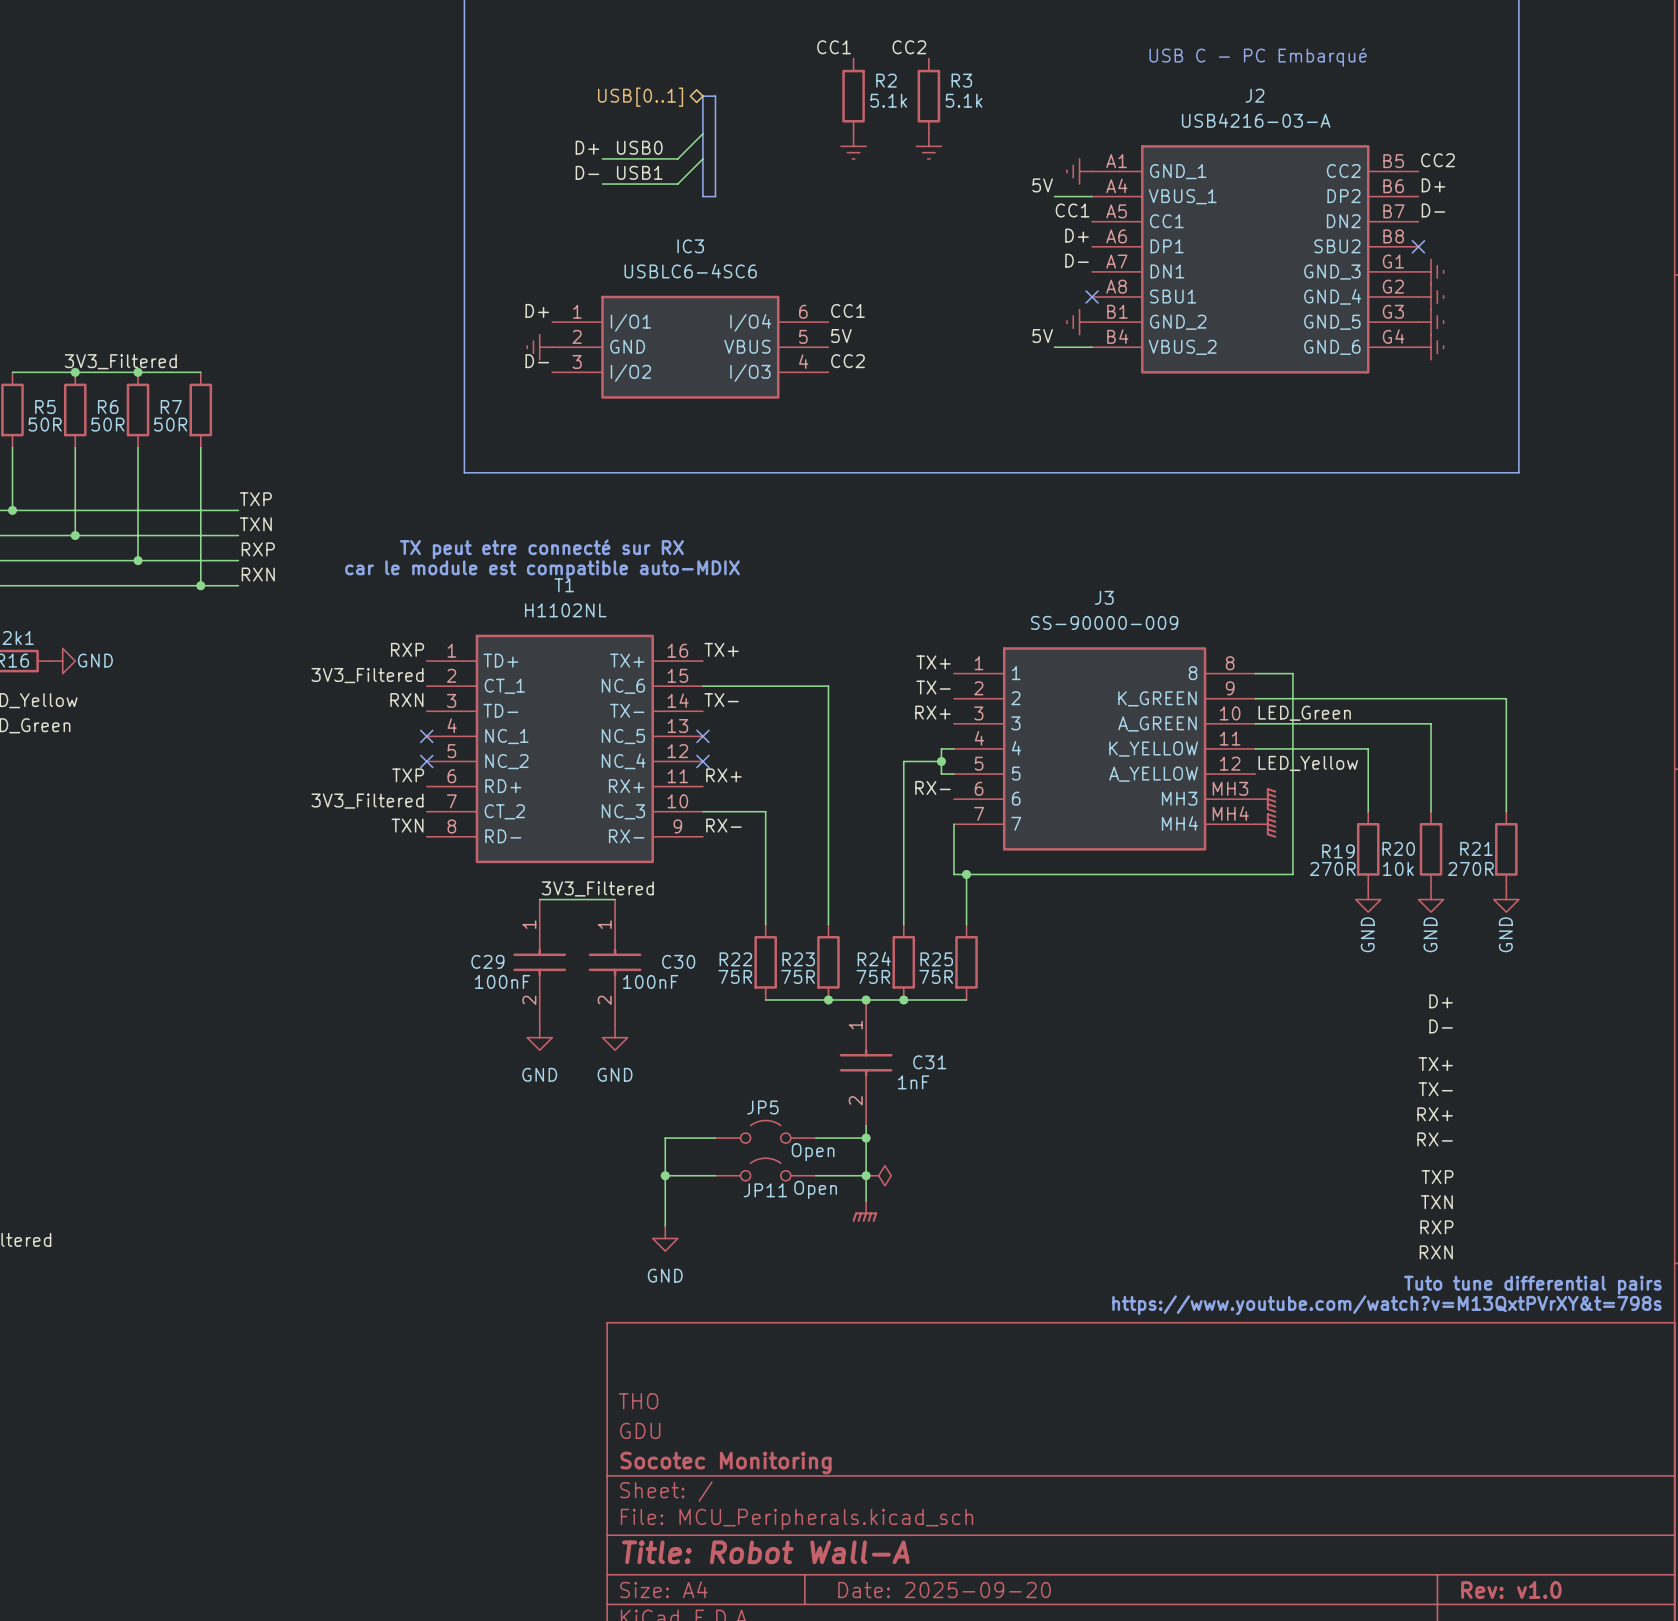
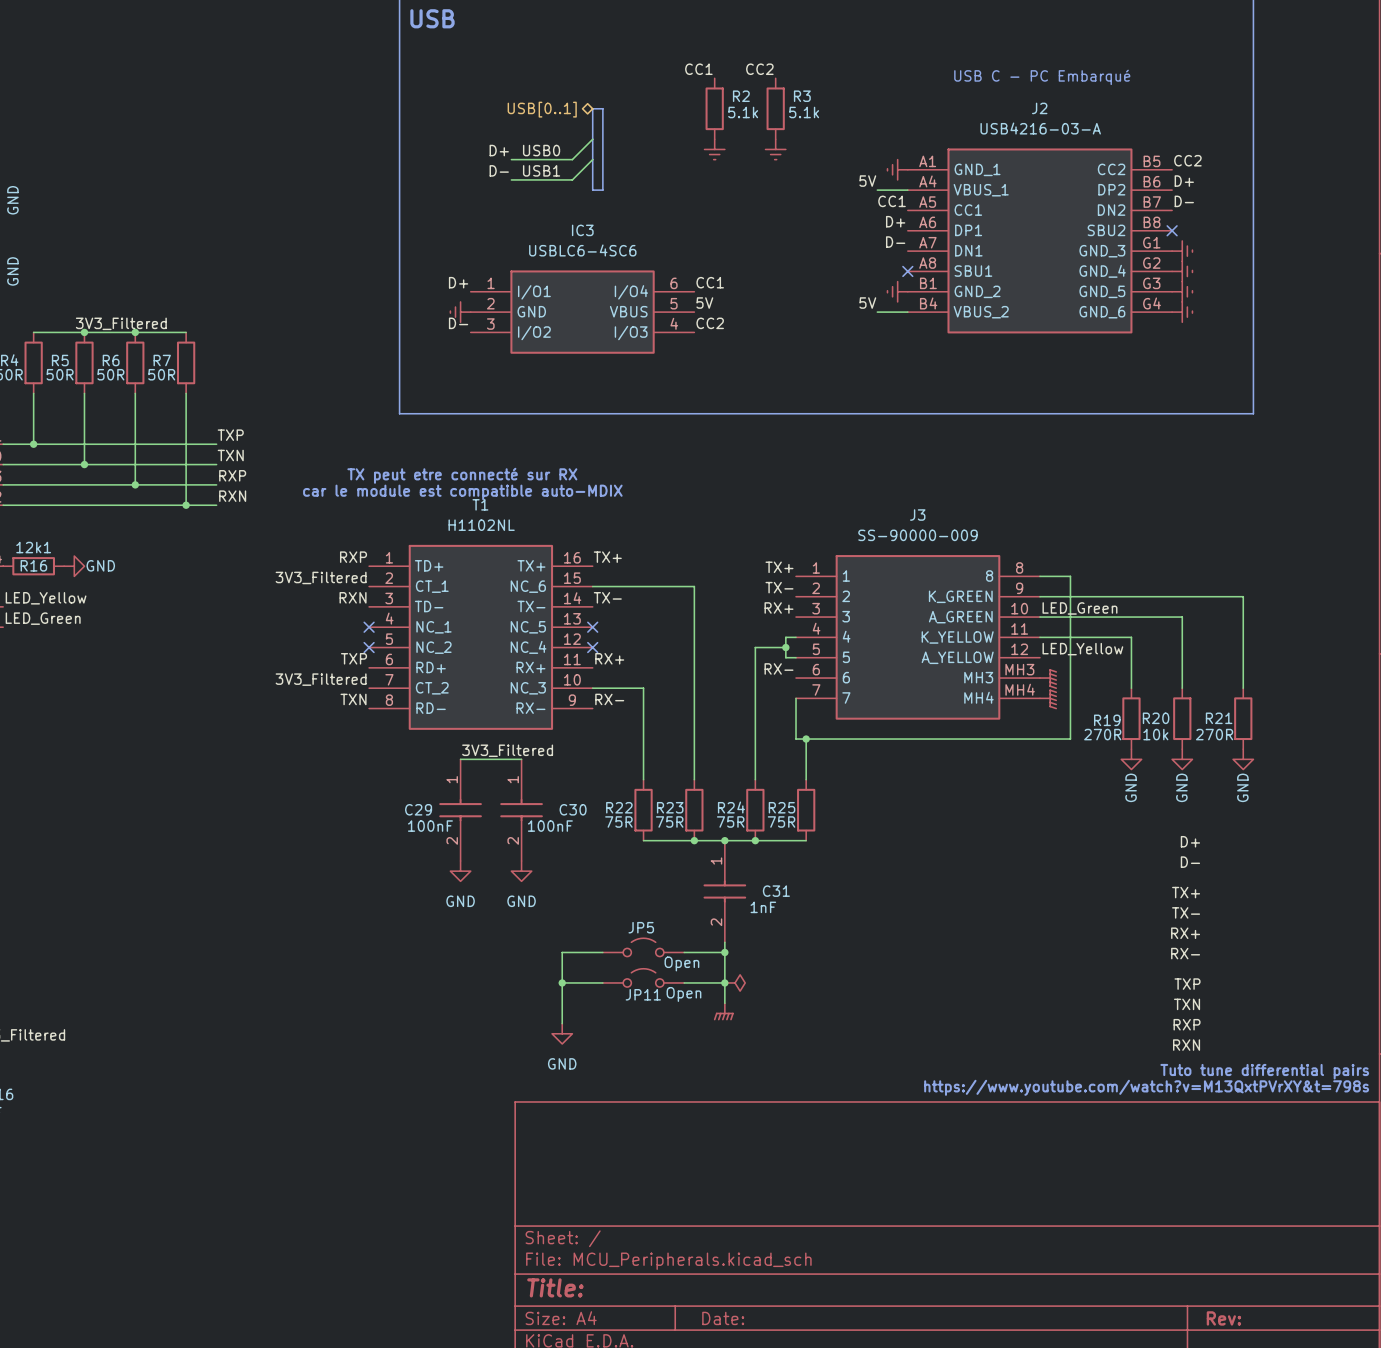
title block: THO (638, 1401) -> none
title block: GDU (640, 1430) -> none
title block: Socotec Monitoring (725, 1463) -> none
title block: Title: Robot Wall-A (765, 1552) -> Title: (555, 1287)
title block: Date: 2025-09-20 (944, 1590) -> Date: (723, 1318)
title block: Rev: v1.0 (1511, 1590) -> Rev: (1223, 1318)

